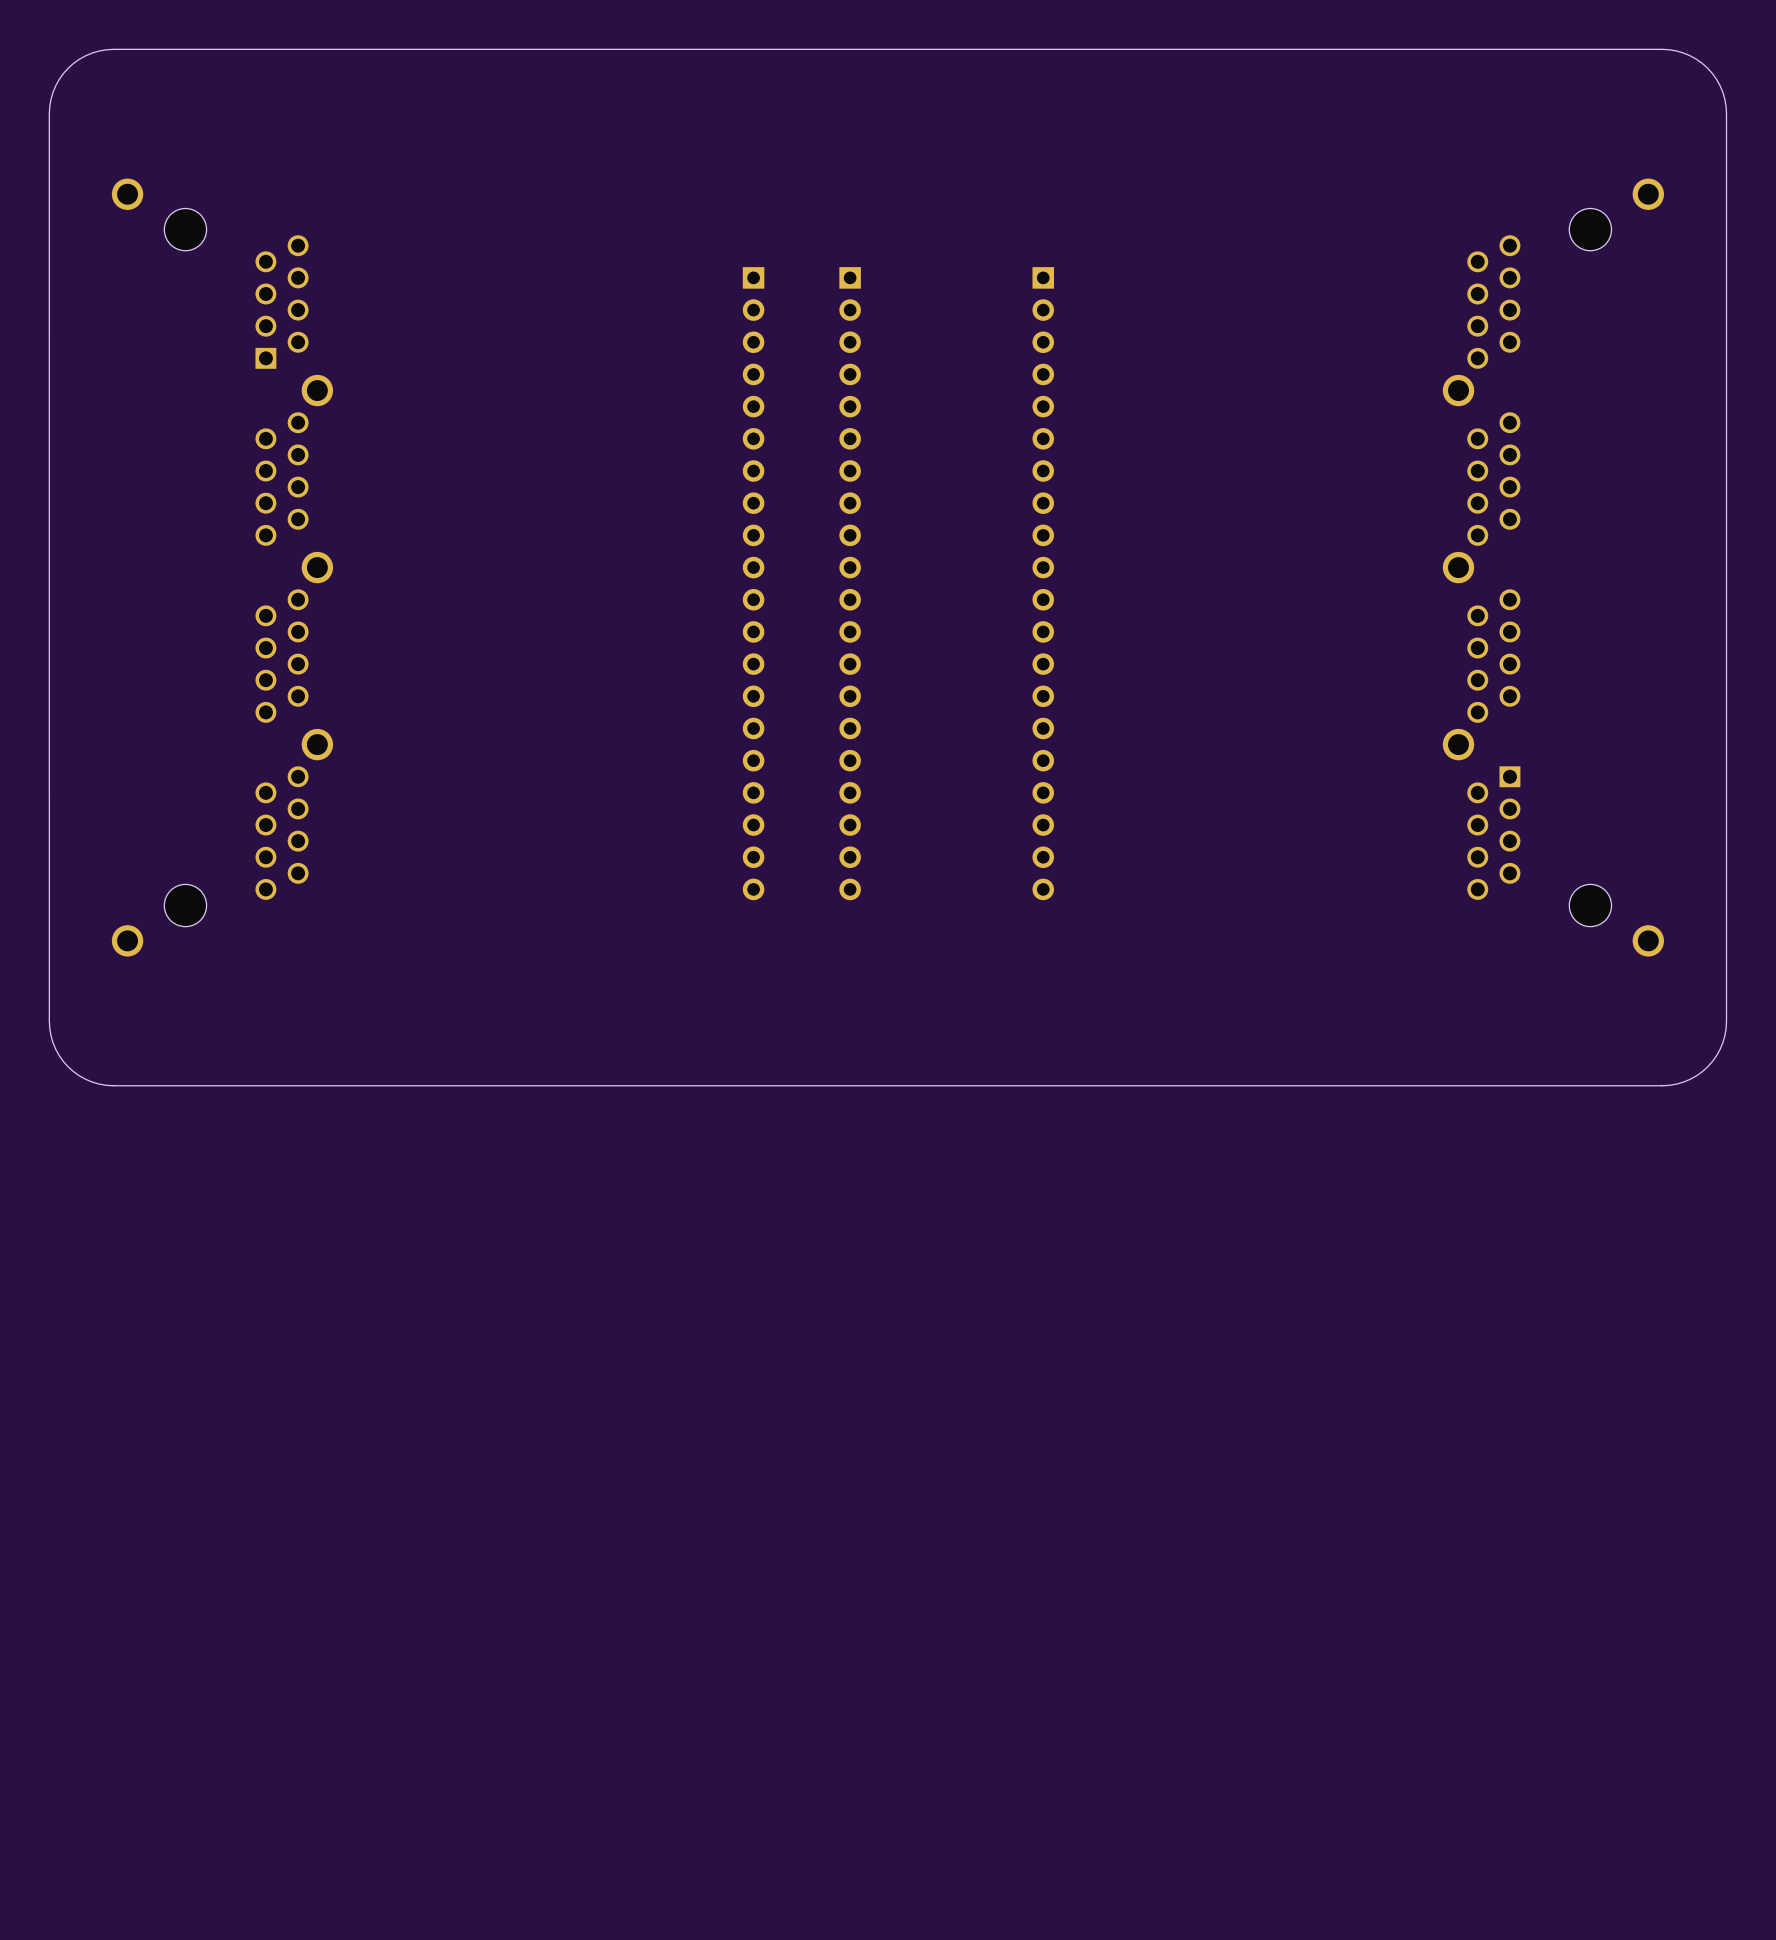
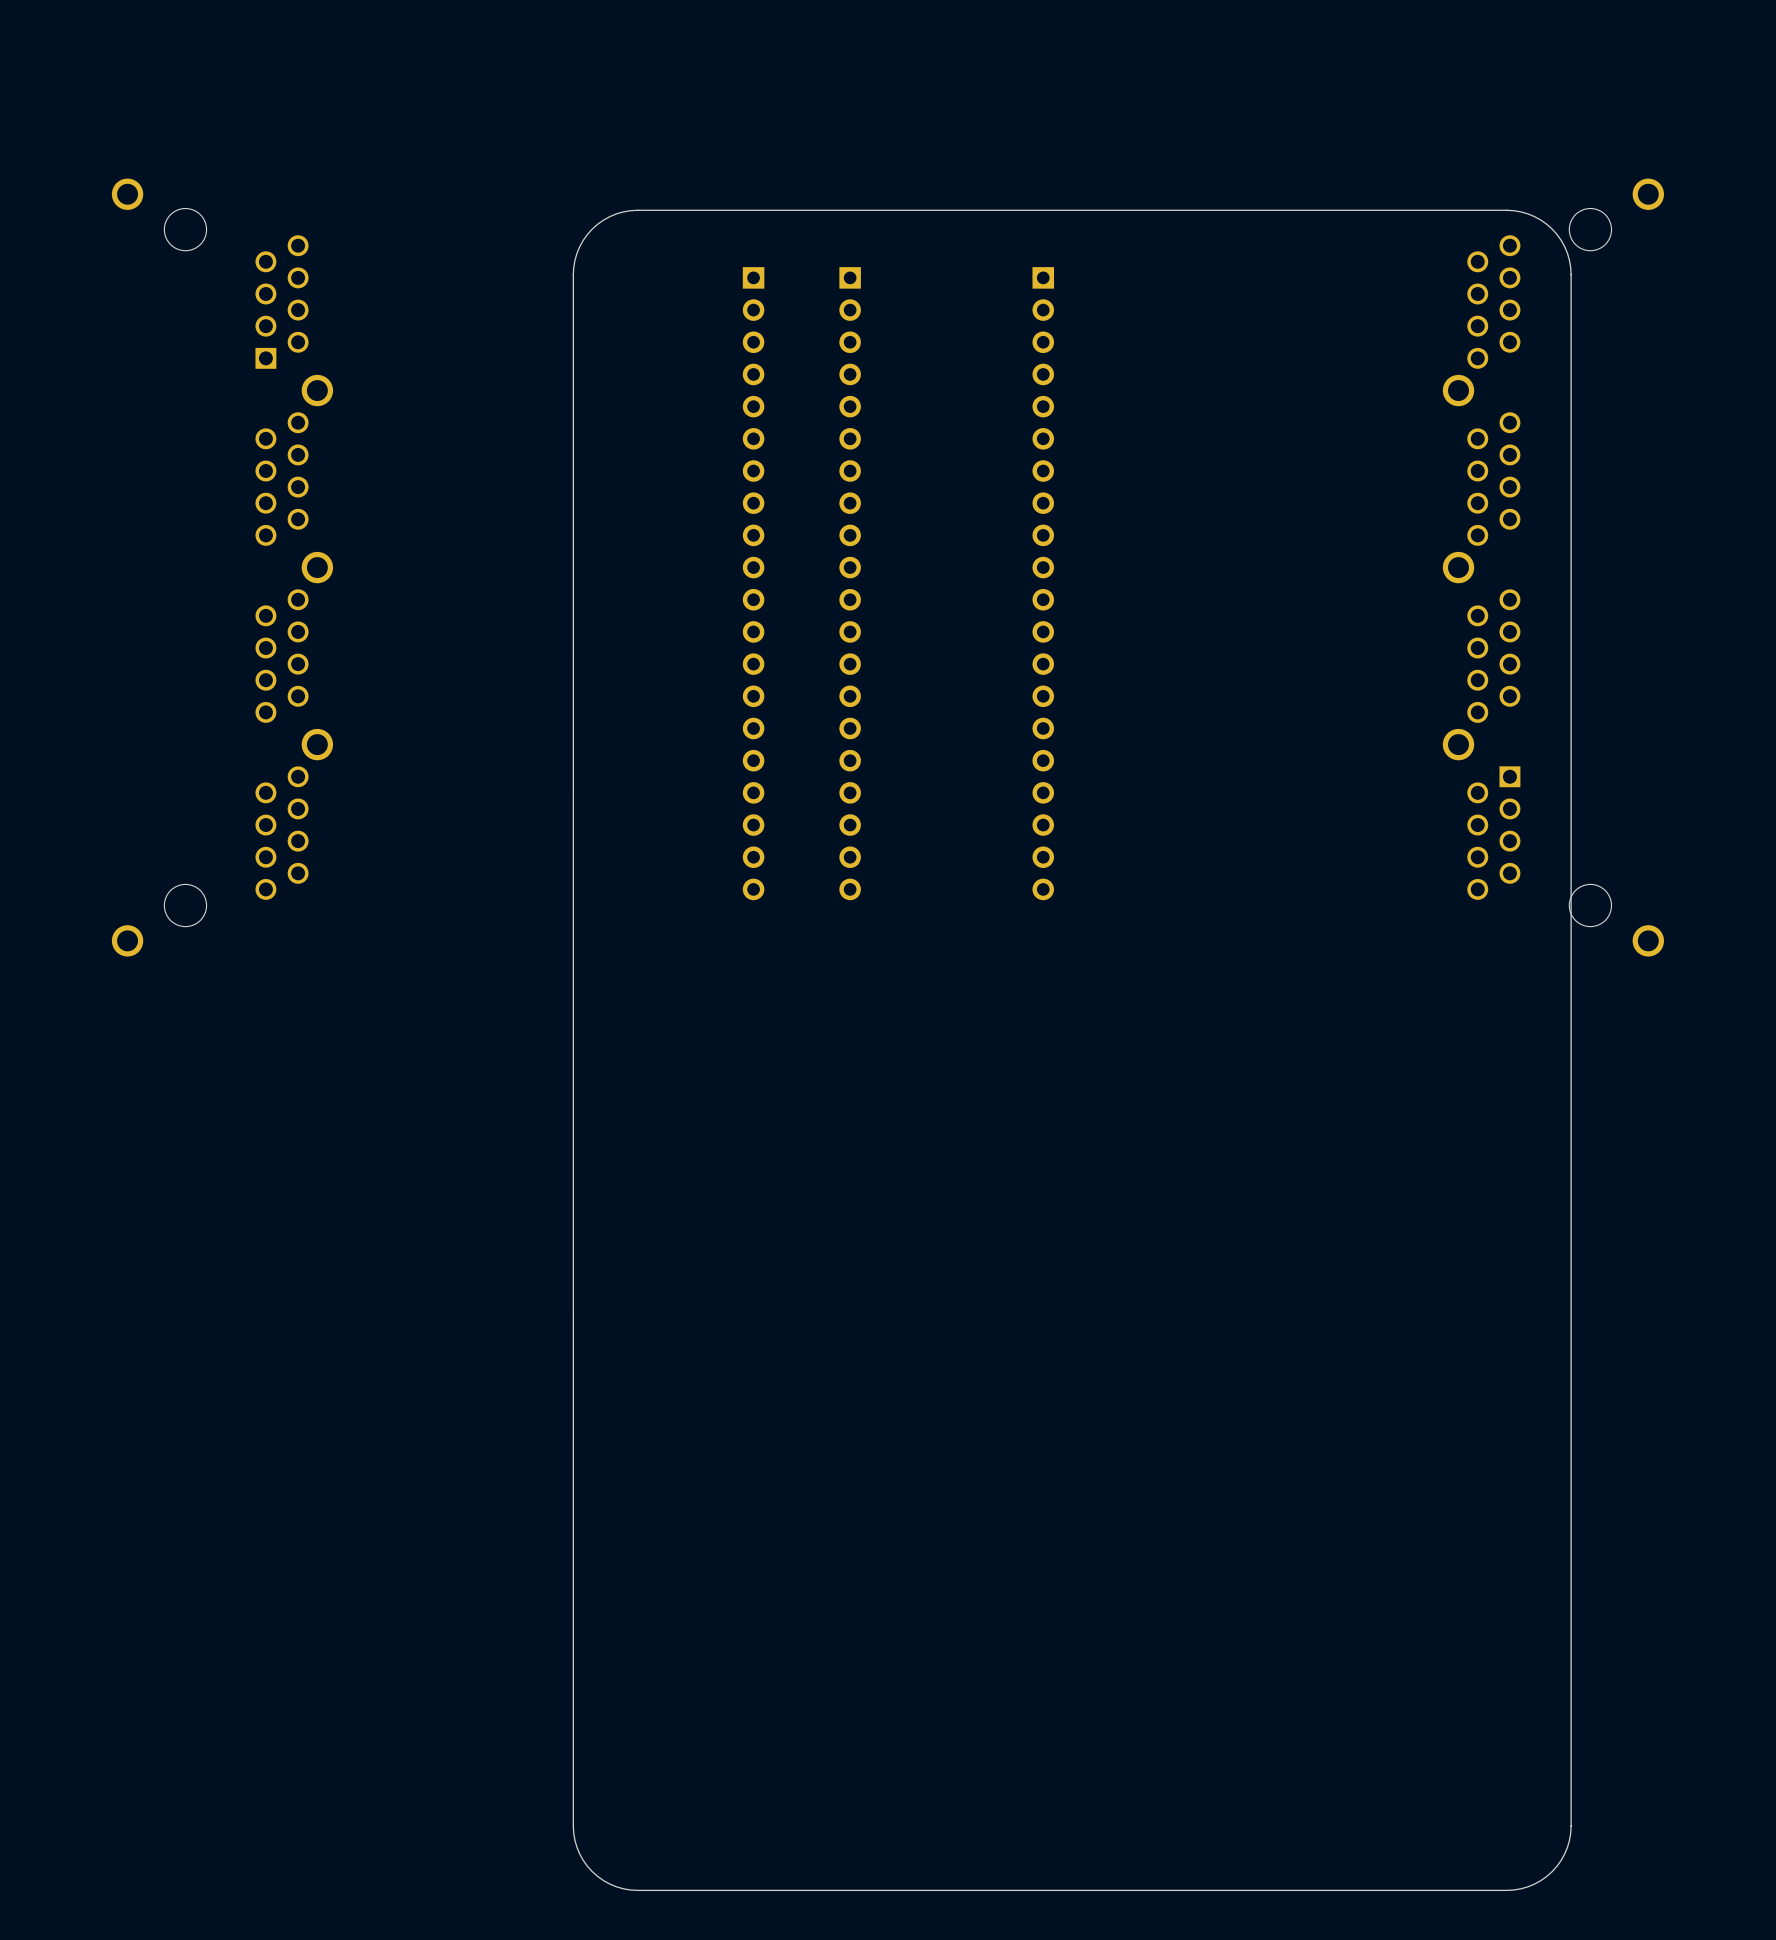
board edge: (1661, 49) (113, 49) (99, 50) (79, 59) (68, 68) (55, 85) (50, 99) (49, 113) (49, 1021) (50, 1035) (59, 1055) (68, 1066) (79, 1075) (99, 1084) (113, 1085) (1662, 1085) (1676, 1084) (1696, 1075) (1707, 1066) (1716, 1055) (1724, 1035) (1726, 1021) (1726, 113) (1722, 92) (1716, 79) (1707, 68) (1689, 55) (1676, 50) (1661, 49) -> none
board edge: none -> (1571, 1826) (1567, 1847) (1561, 1860) (1552, 1871) (1540, 1880) (1527, 1886) (1506, 1890) (637, 1890) (623, 1888) (609, 1884) (597, 1876) (583, 1860) (574, 1840) (573, 1826) (573, 274) (574, 260) (579, 246) (592, 229) (603, 220) (616, 213) (637, 210) (1506, 210) (1521, 211) (1534, 216) (1552, 229) (1561, 240) (1569, 260) (1571, 274) (1571, 1826)

